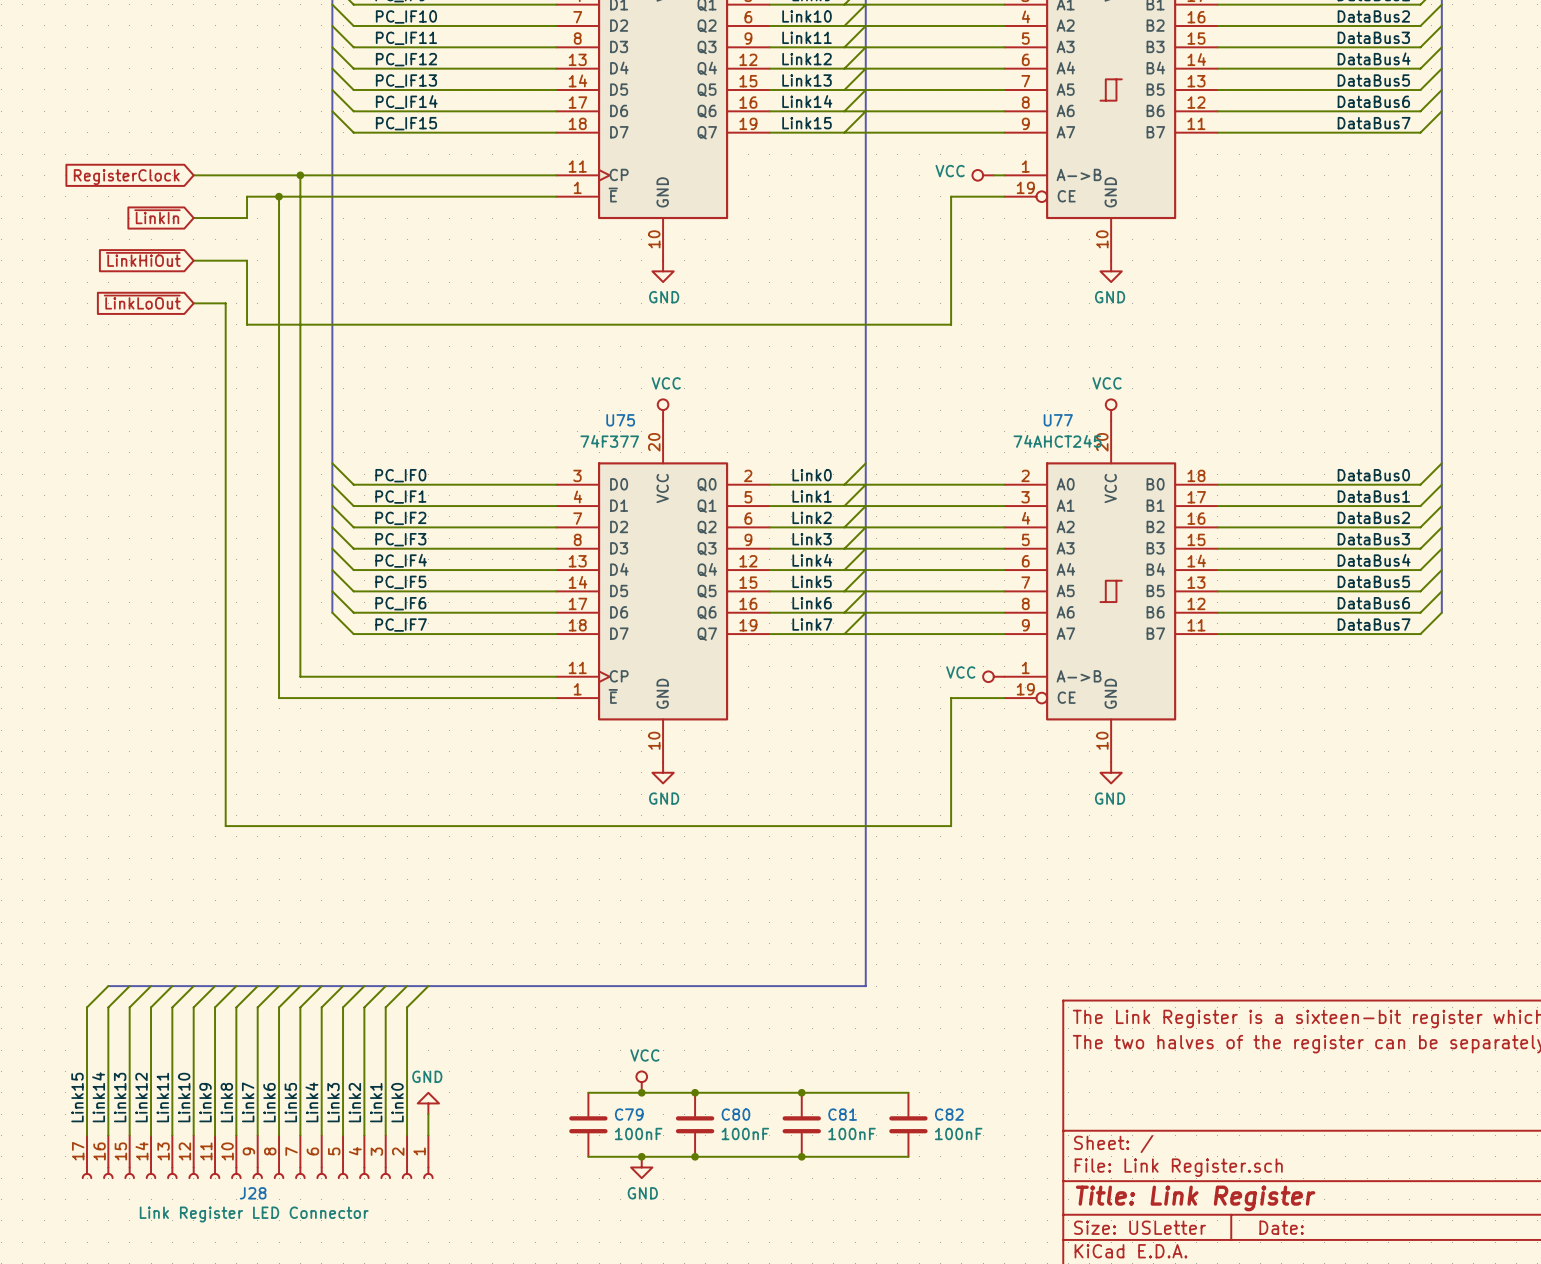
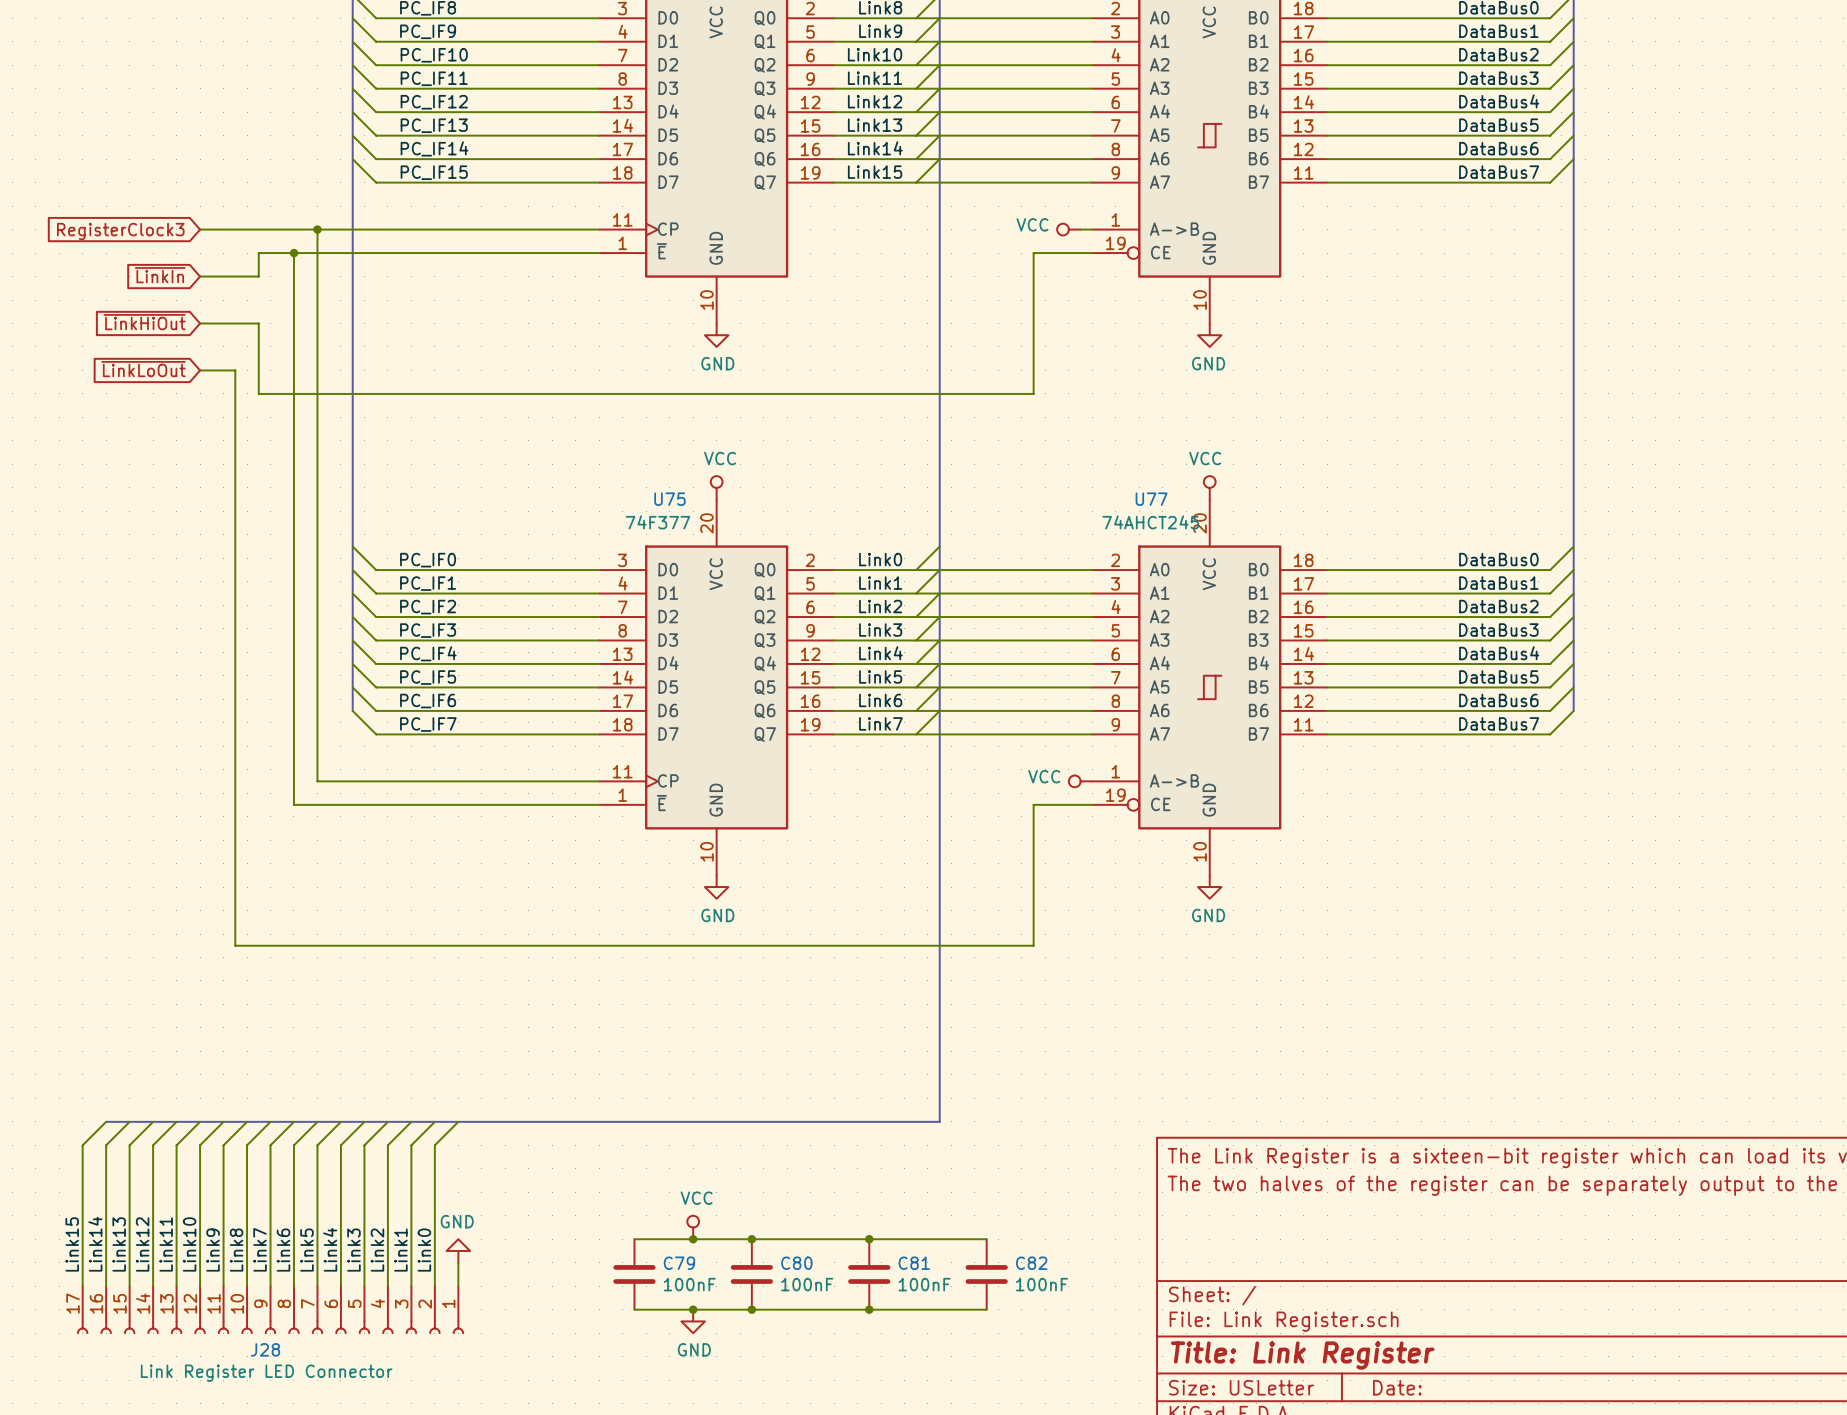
global label: RegisterClock (126, 177) -> RegisterClock3 (120, 231)

